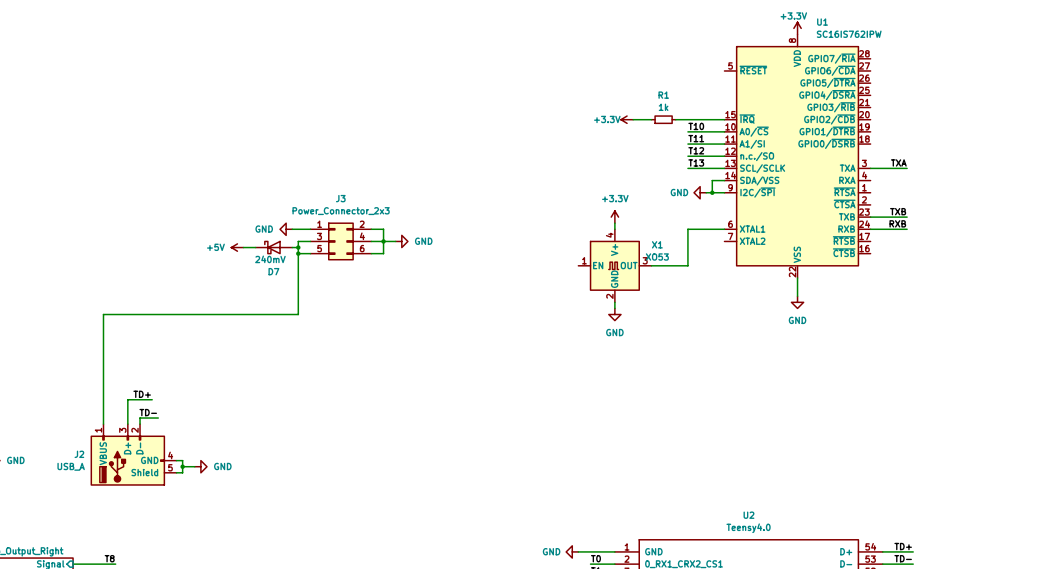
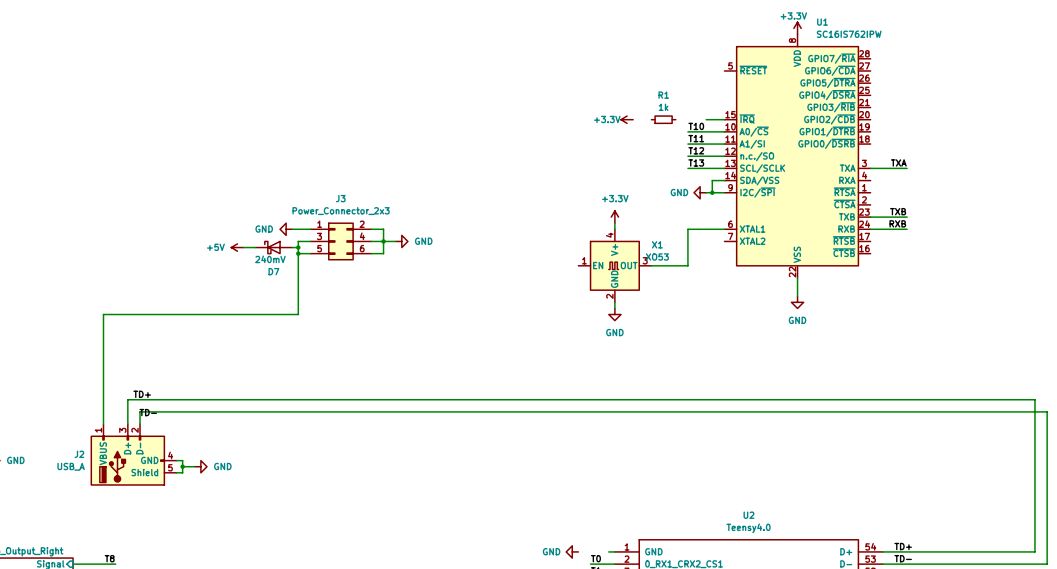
wire: (633, 119) (651, 119) -> none
wire: (675, 119) (706, 119) -> none
wire: none -> (152, 399) (1034, 399) (1034, 551) (913, 551)
wire: (140, 418) (158, 418) -> (140, 418) (140, 411) (1047, 411) (1047, 564) (913, 564)
wire: (578, 551) (608, 551) -> none

